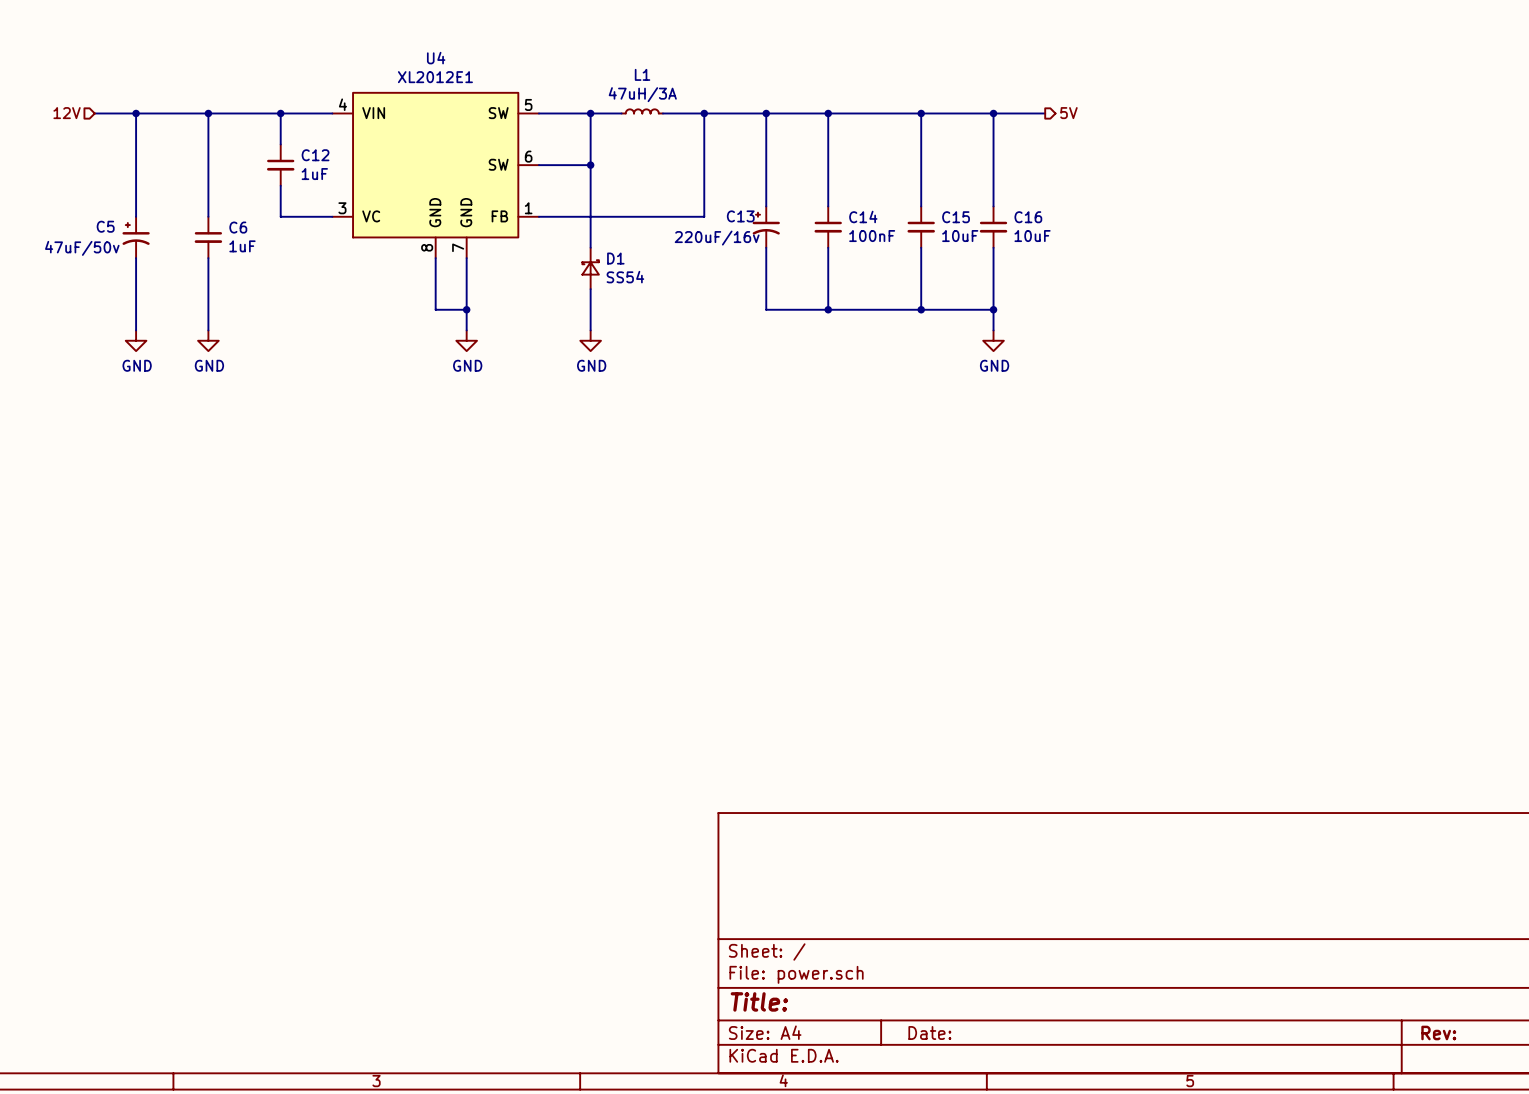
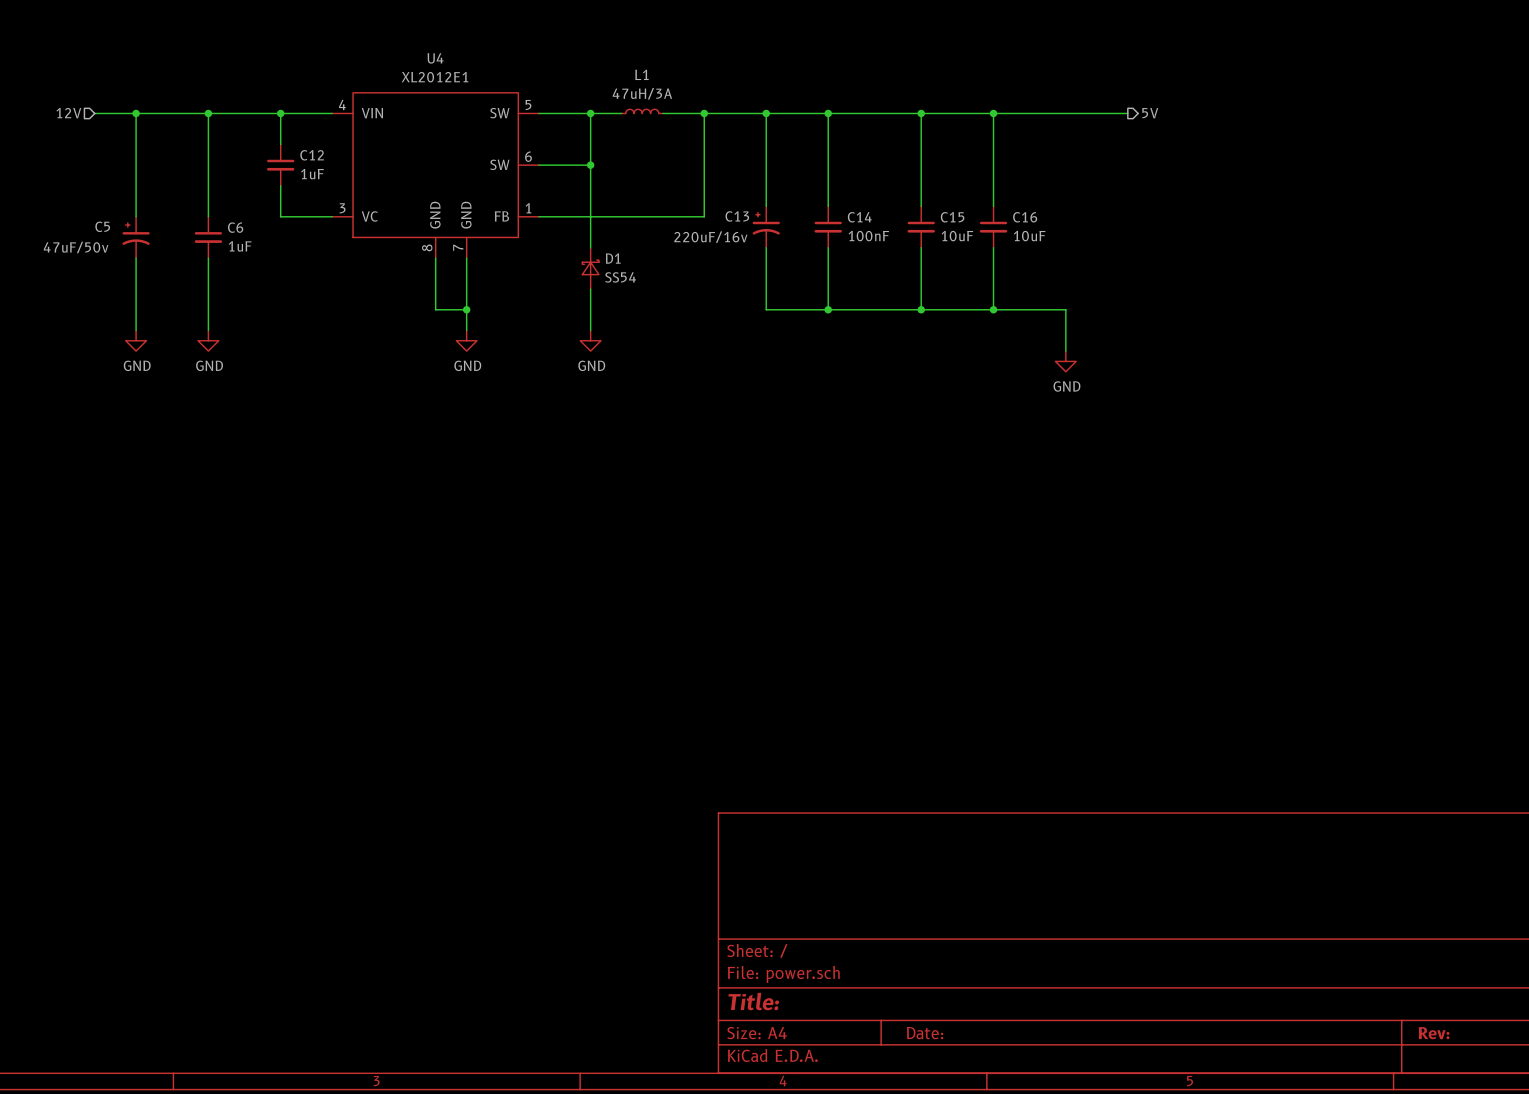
wire: none -> (1045, 113) (1127, 113)
hierarchical label position: 5V (1068, 113) -> 5V (1150, 113)
wire: (993, 309) (993, 330) -> (993, 309) (1065, 309) (1065, 351)
power symbol position: GND (993, 340) -> GND (1065, 361)

